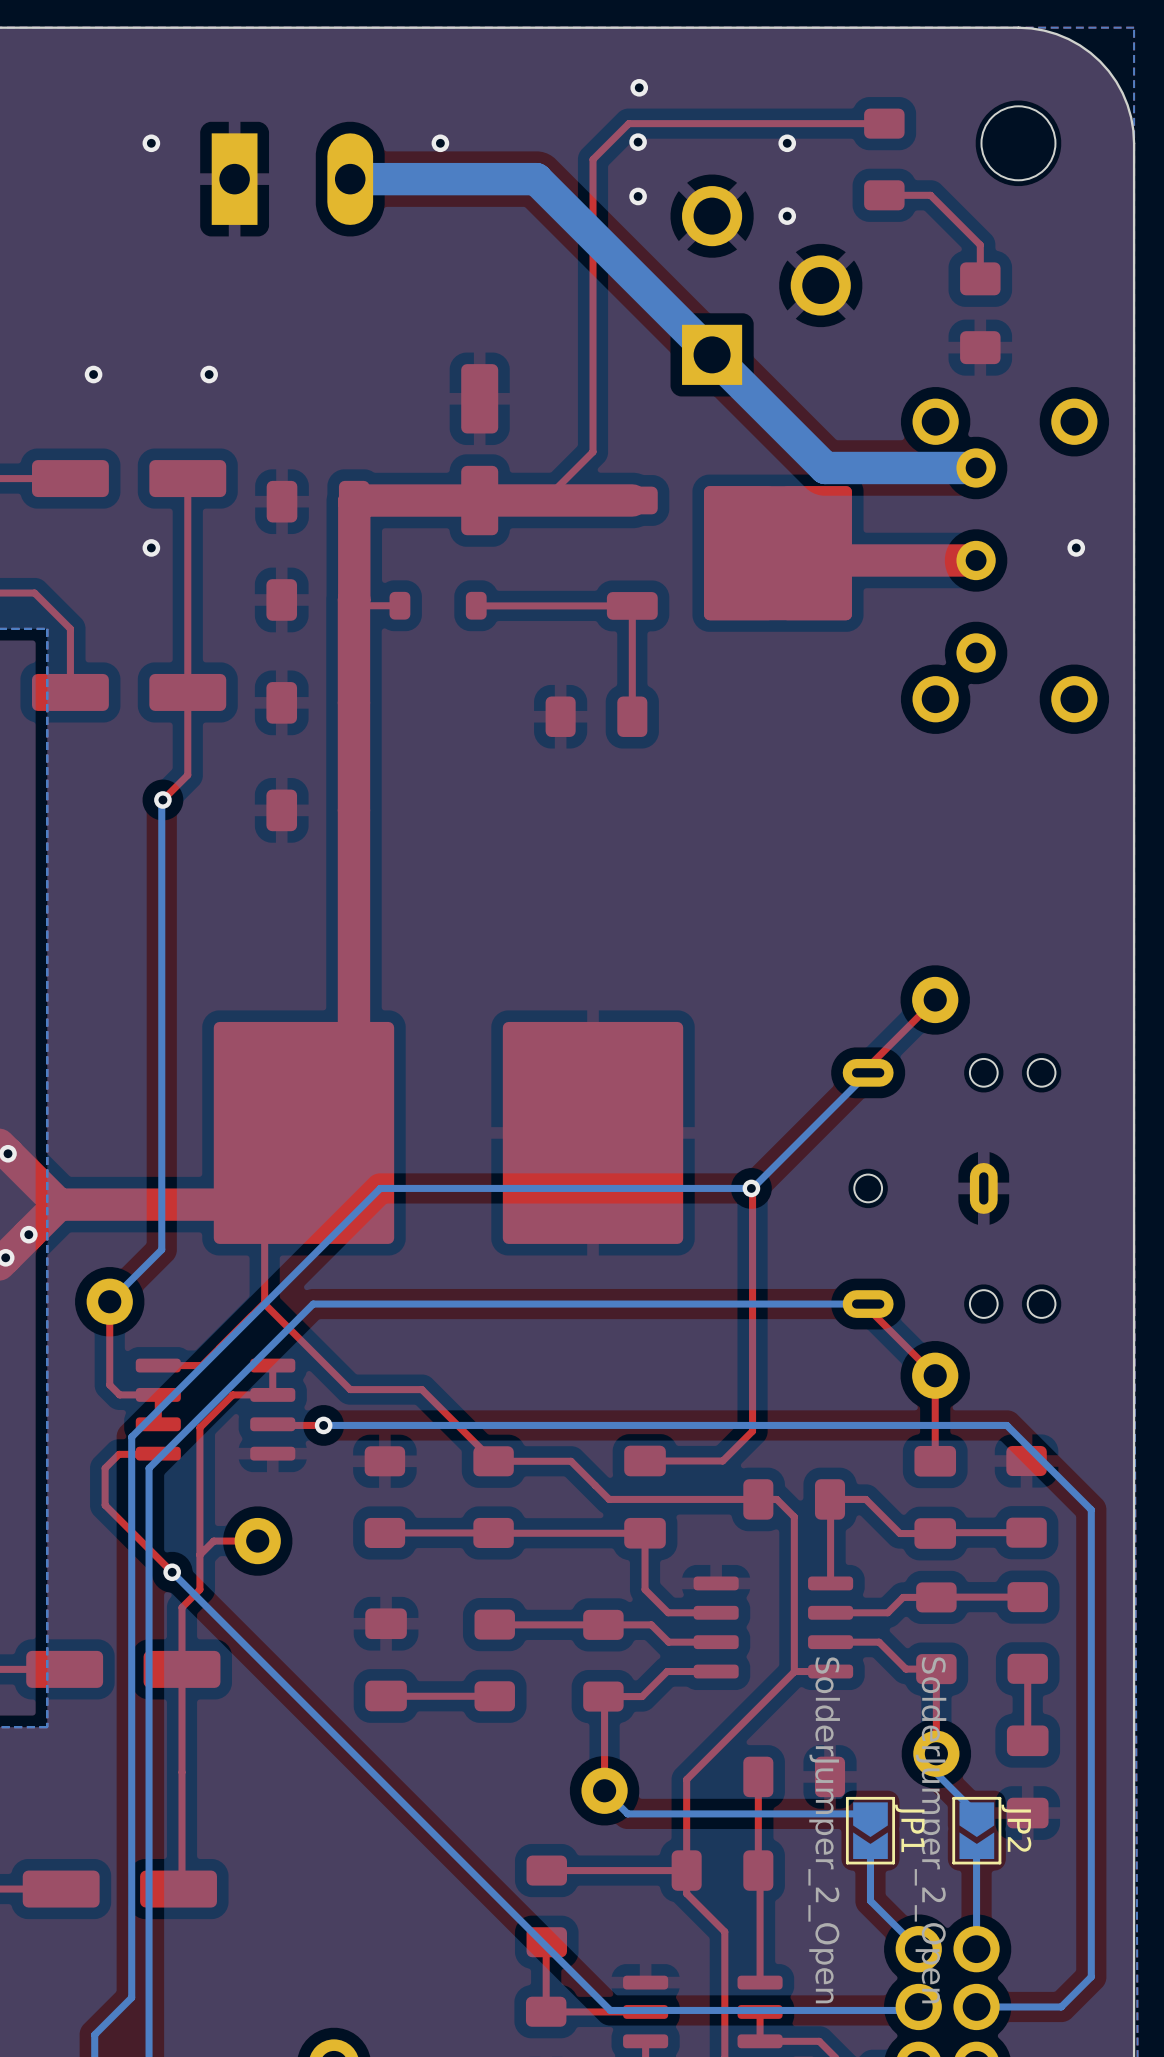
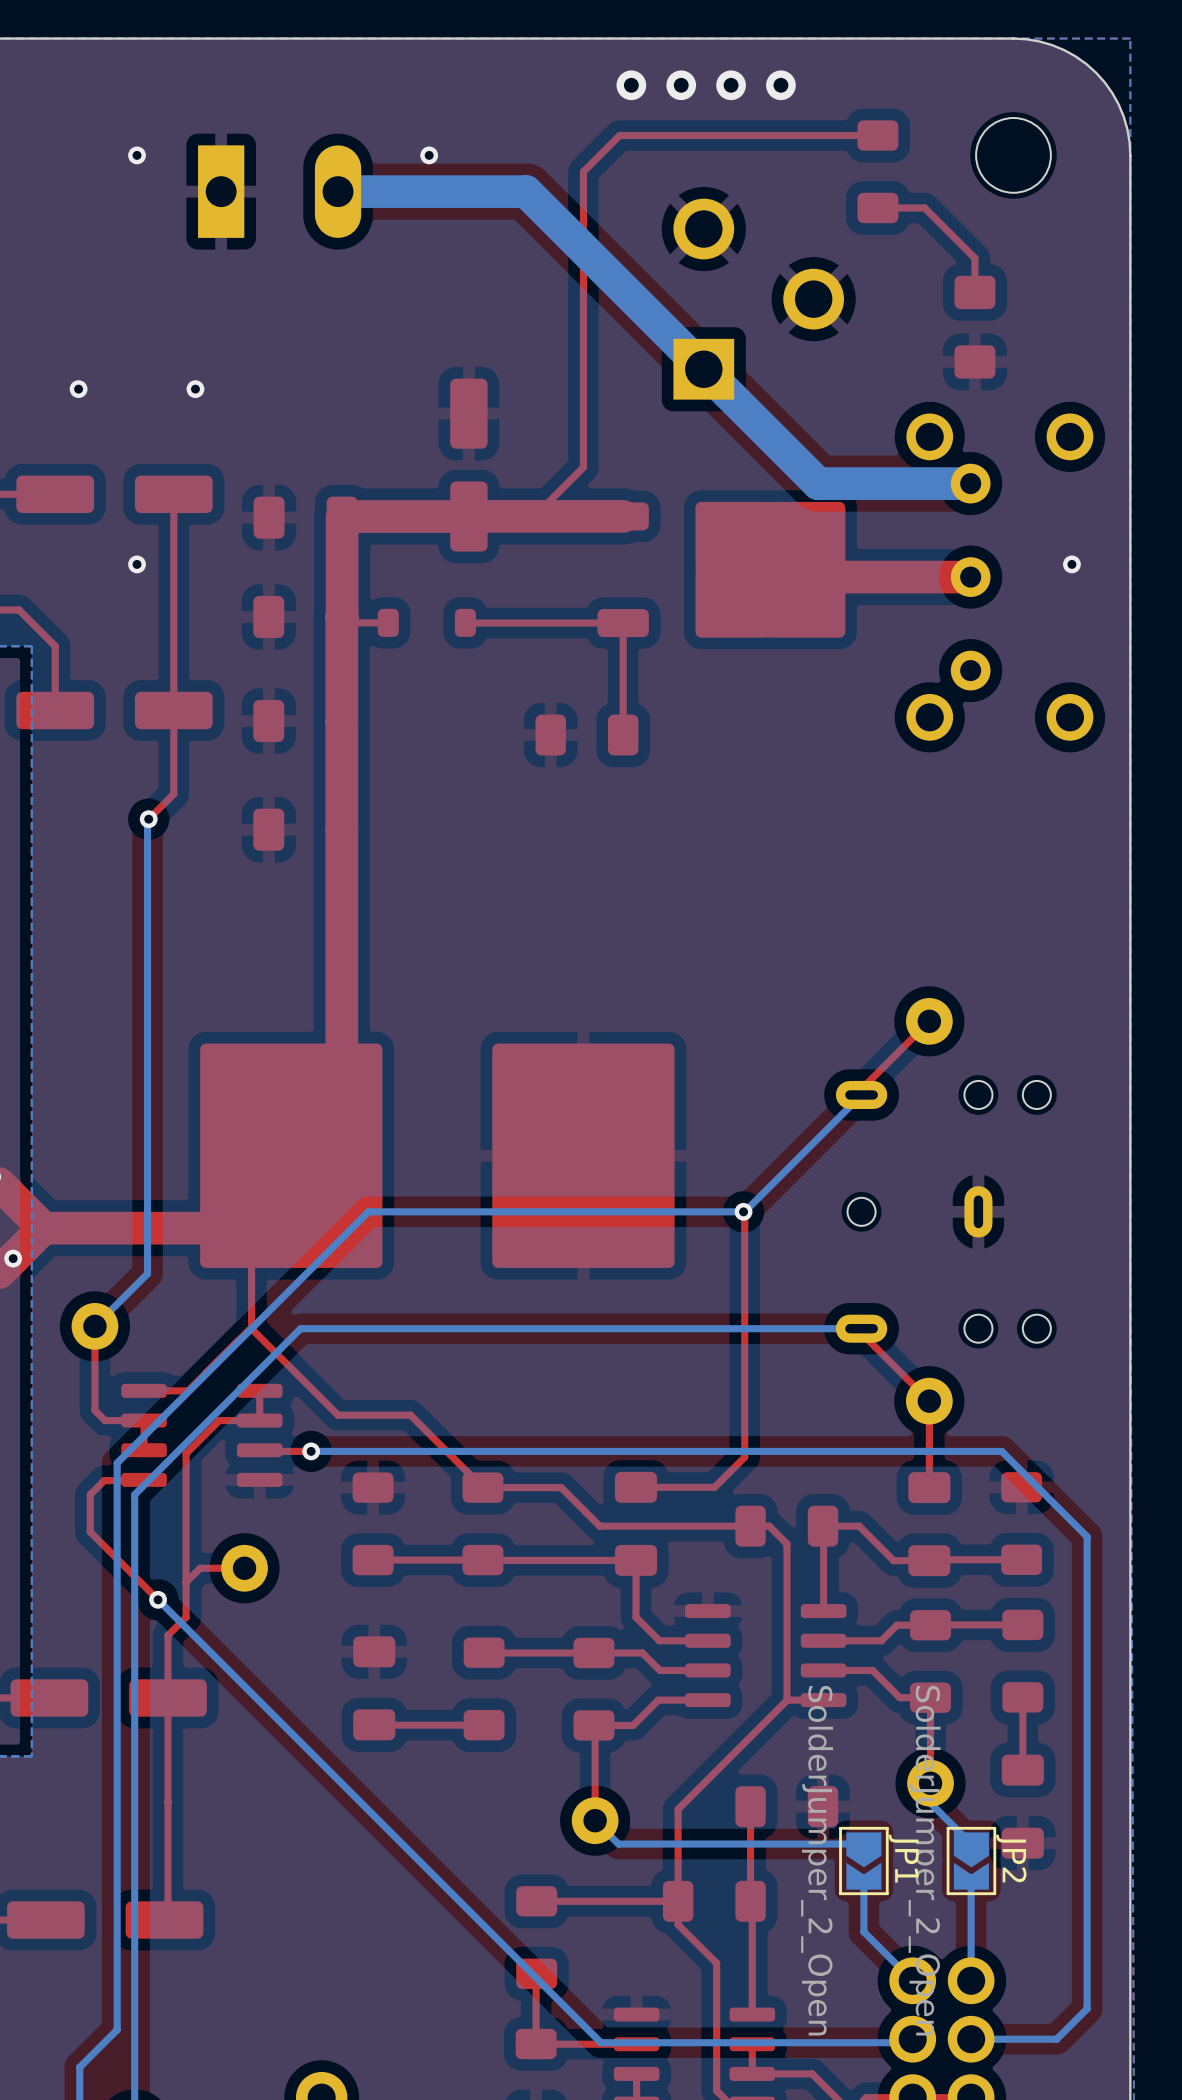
via: none -> (681, 85)
via: none -> (731, 85)
via: none -> (780, 85)
via size: [630, 78, 649, 97] -> [616, 70, 647, 101]
via: (638, 142) -> none
via: (787, 143) -> none
via: (638, 196) -> none
via: (787, 216) -> none

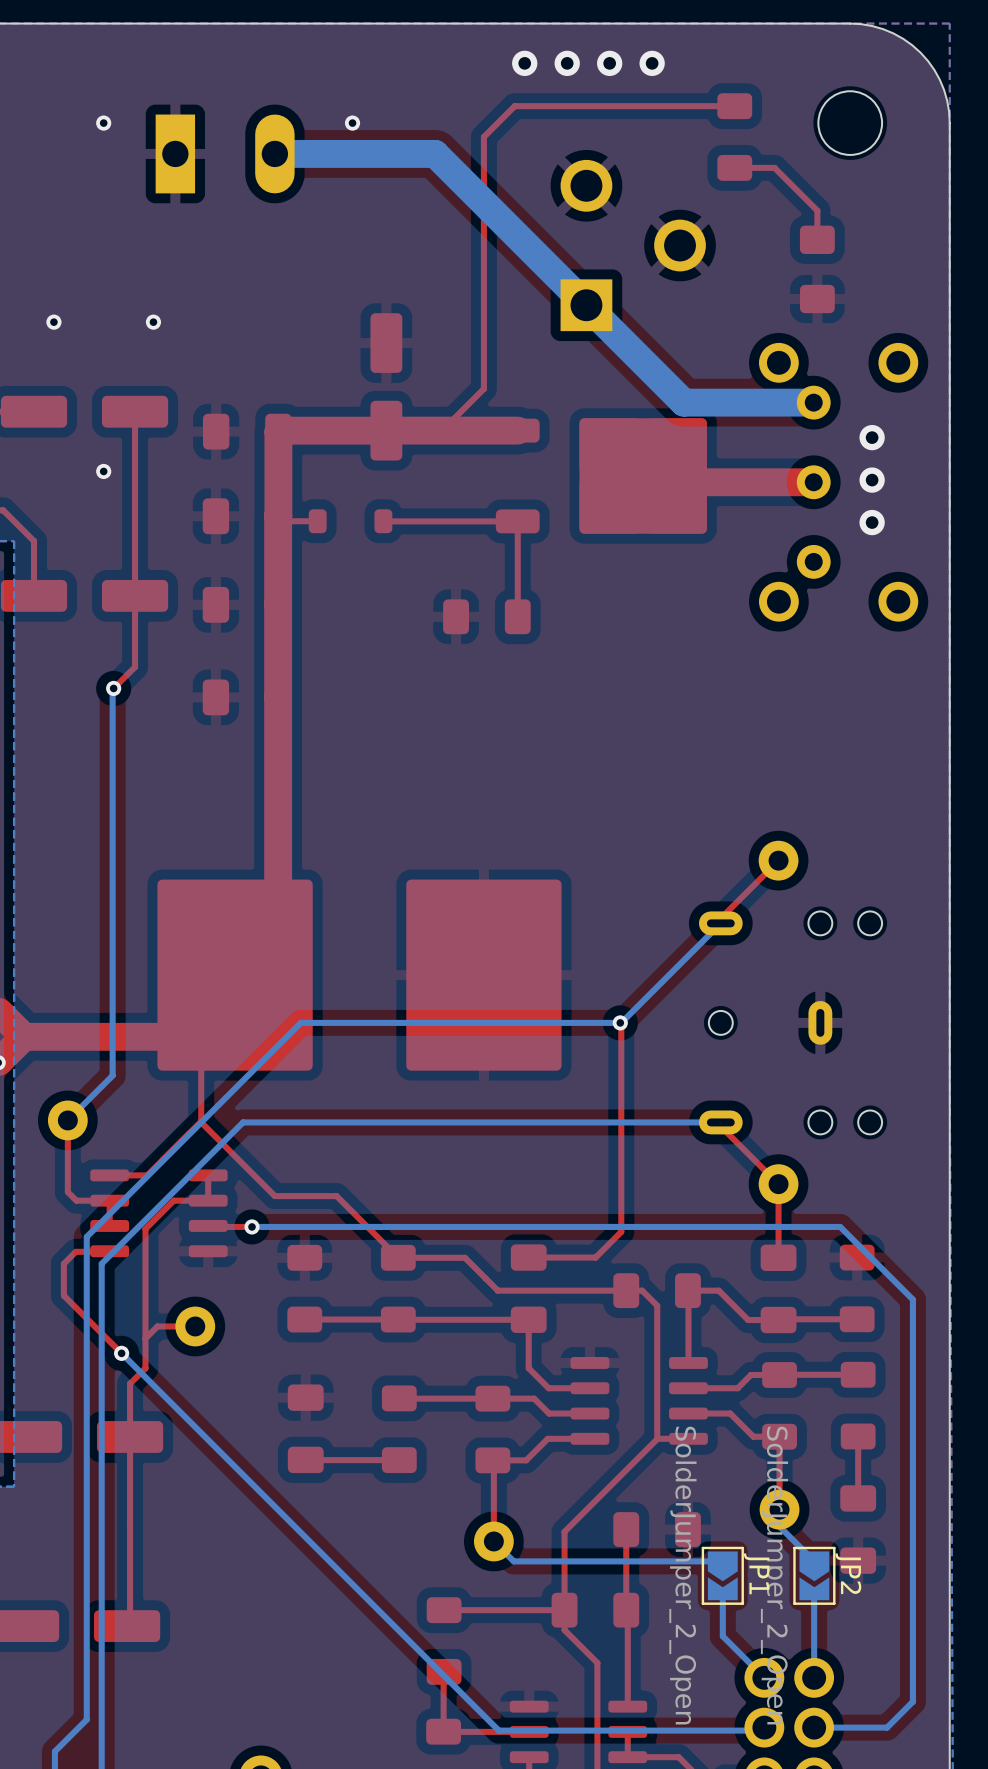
via: none -> (872, 437)
via: (1071, 564) -> none
via: none -> (872, 480)
via: none -> (872, 522)

